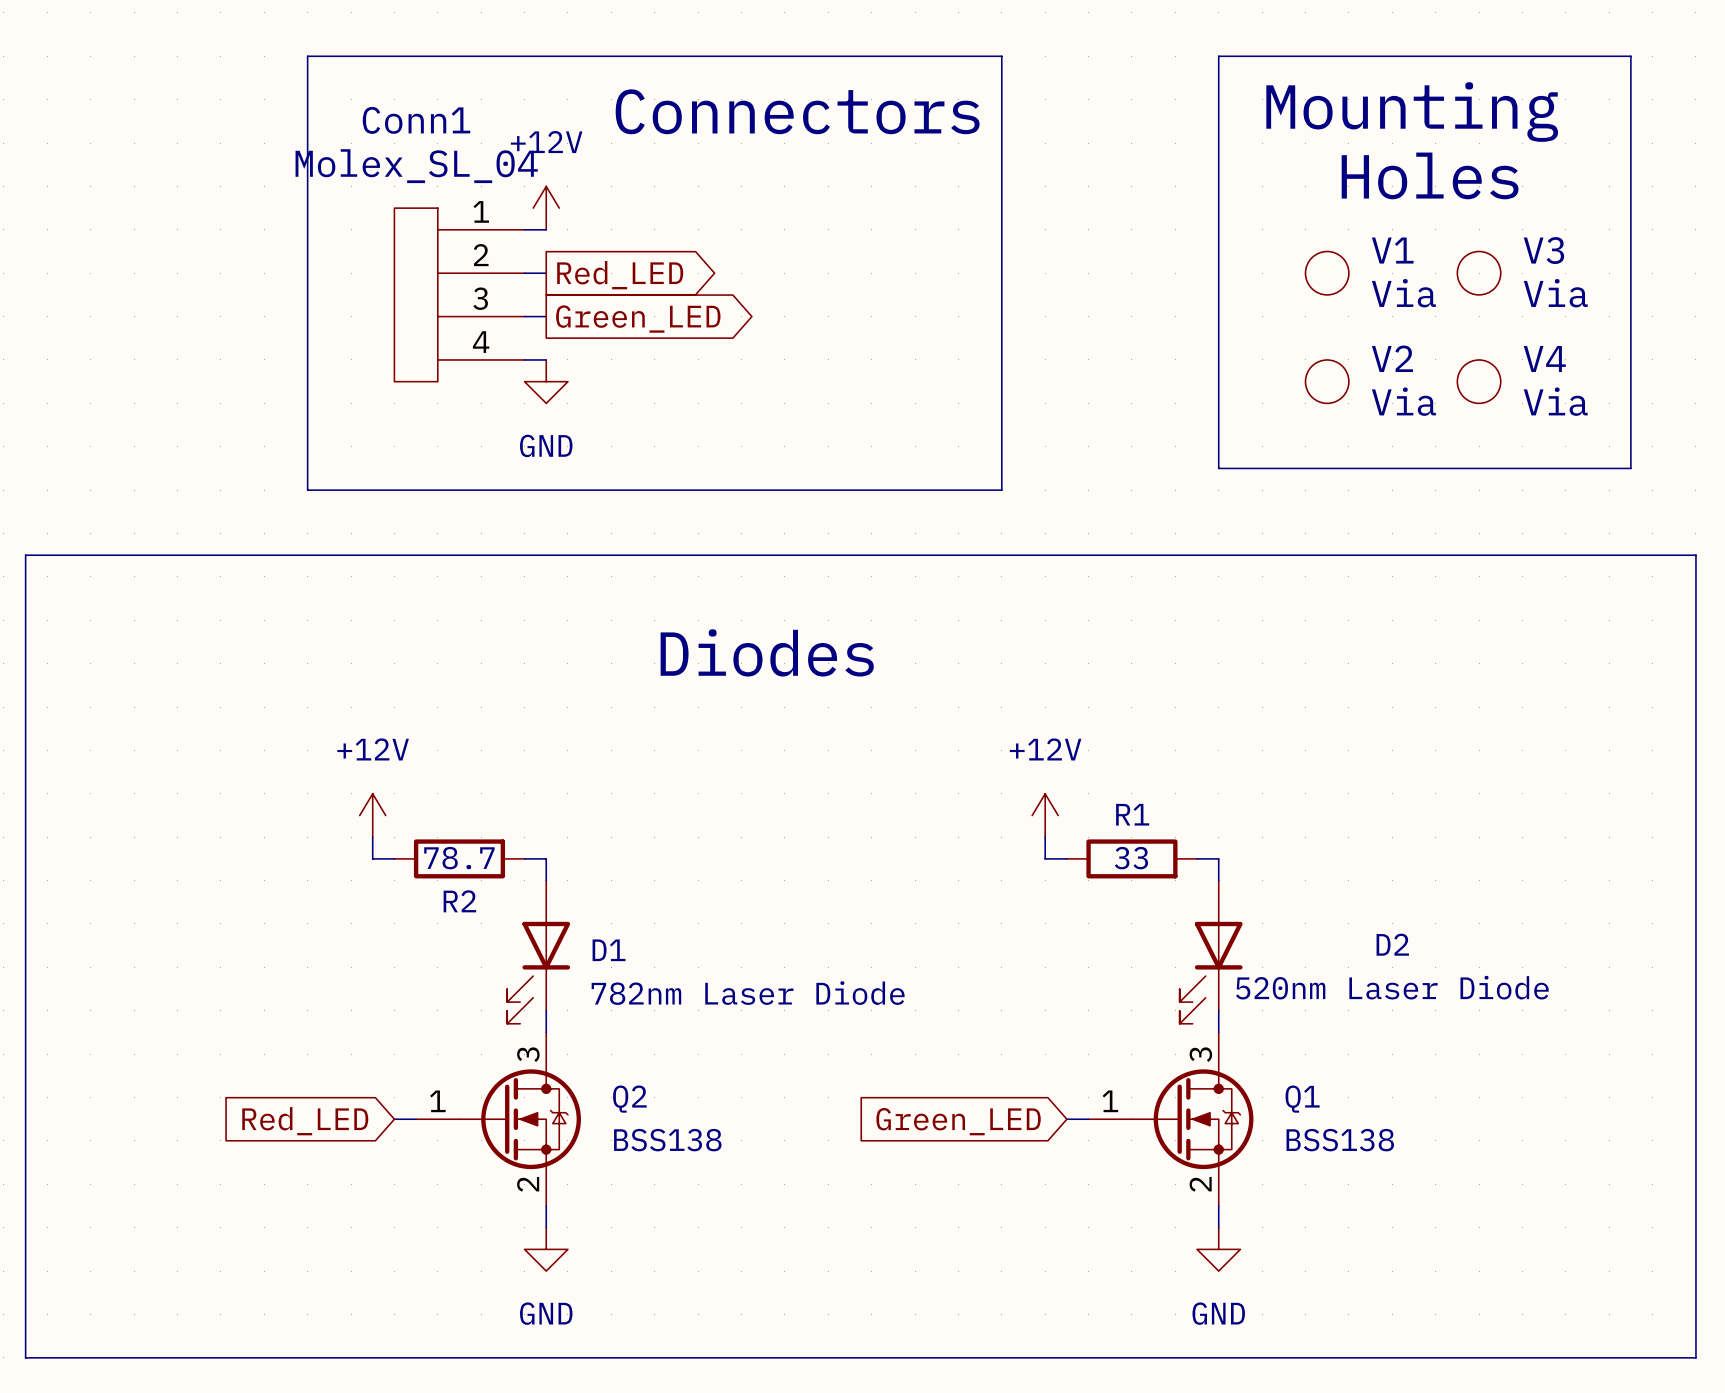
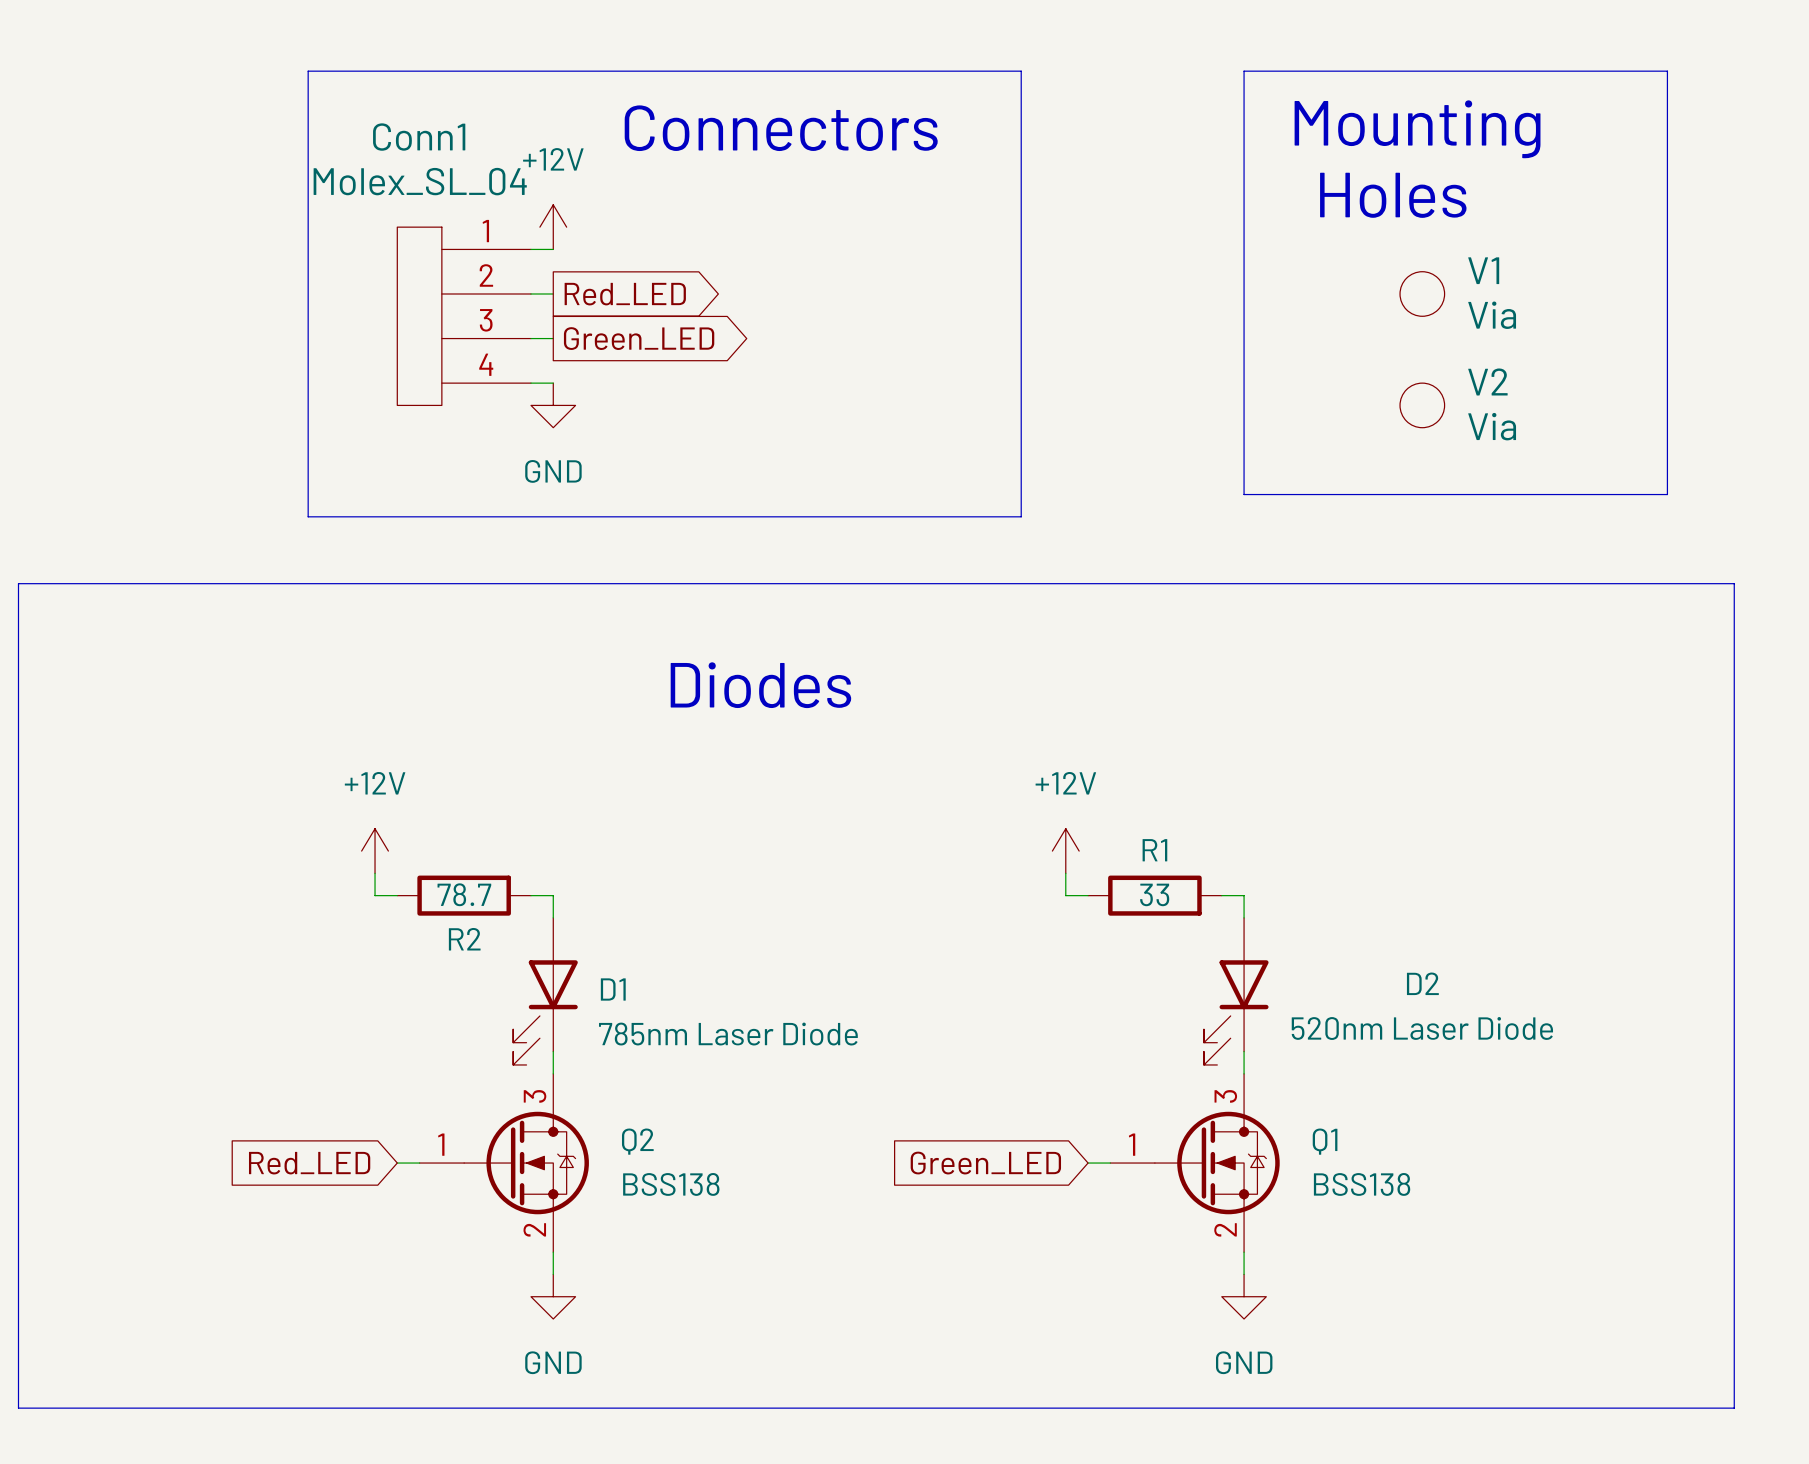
V1 position: (1327, 273) -> (1422, 293)
V3: Via (1479, 273) -> none
V2 position: (1327, 381) -> (1422, 405)
V4: Via (1479, 381) -> none
D1 value: 782nm Laser Diode (748, 993) -> 785nm Laser Diode (728, 1034)

